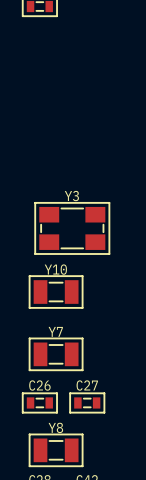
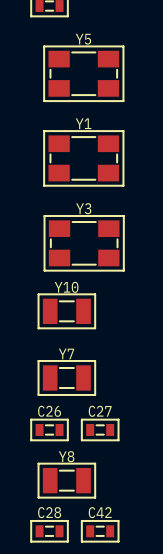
Y5: none -> (83, 73)
Y1: none -> (83, 158)

